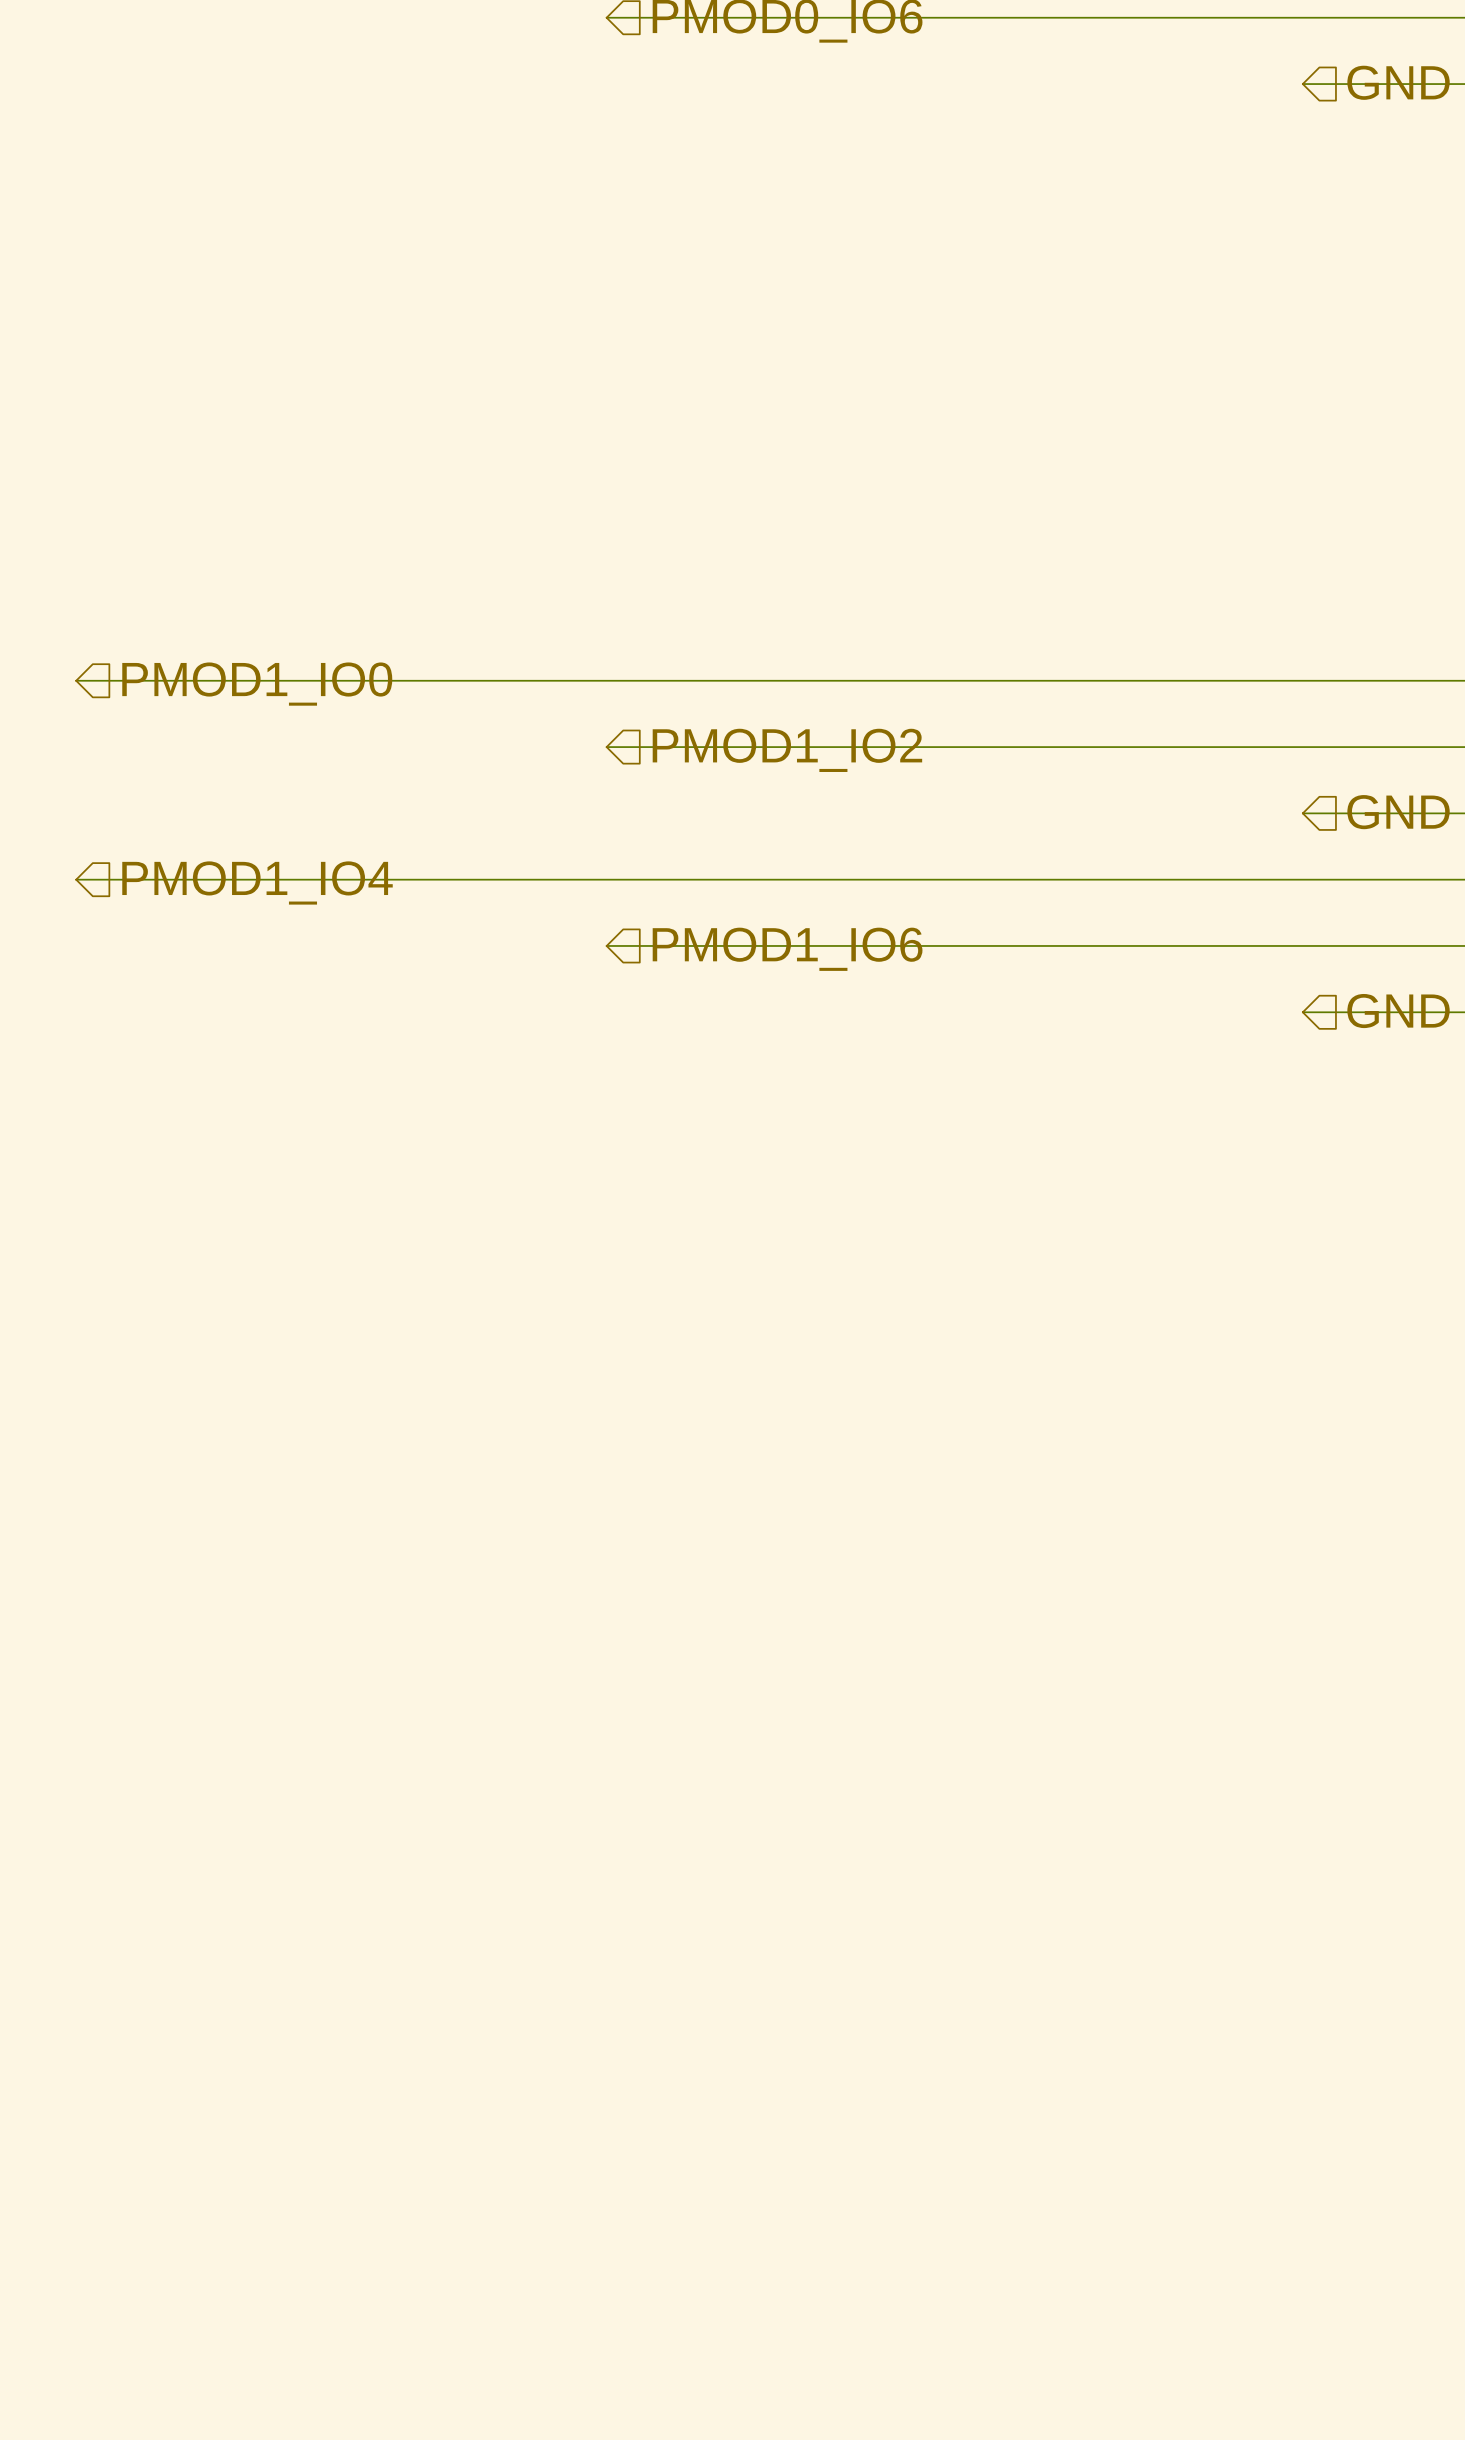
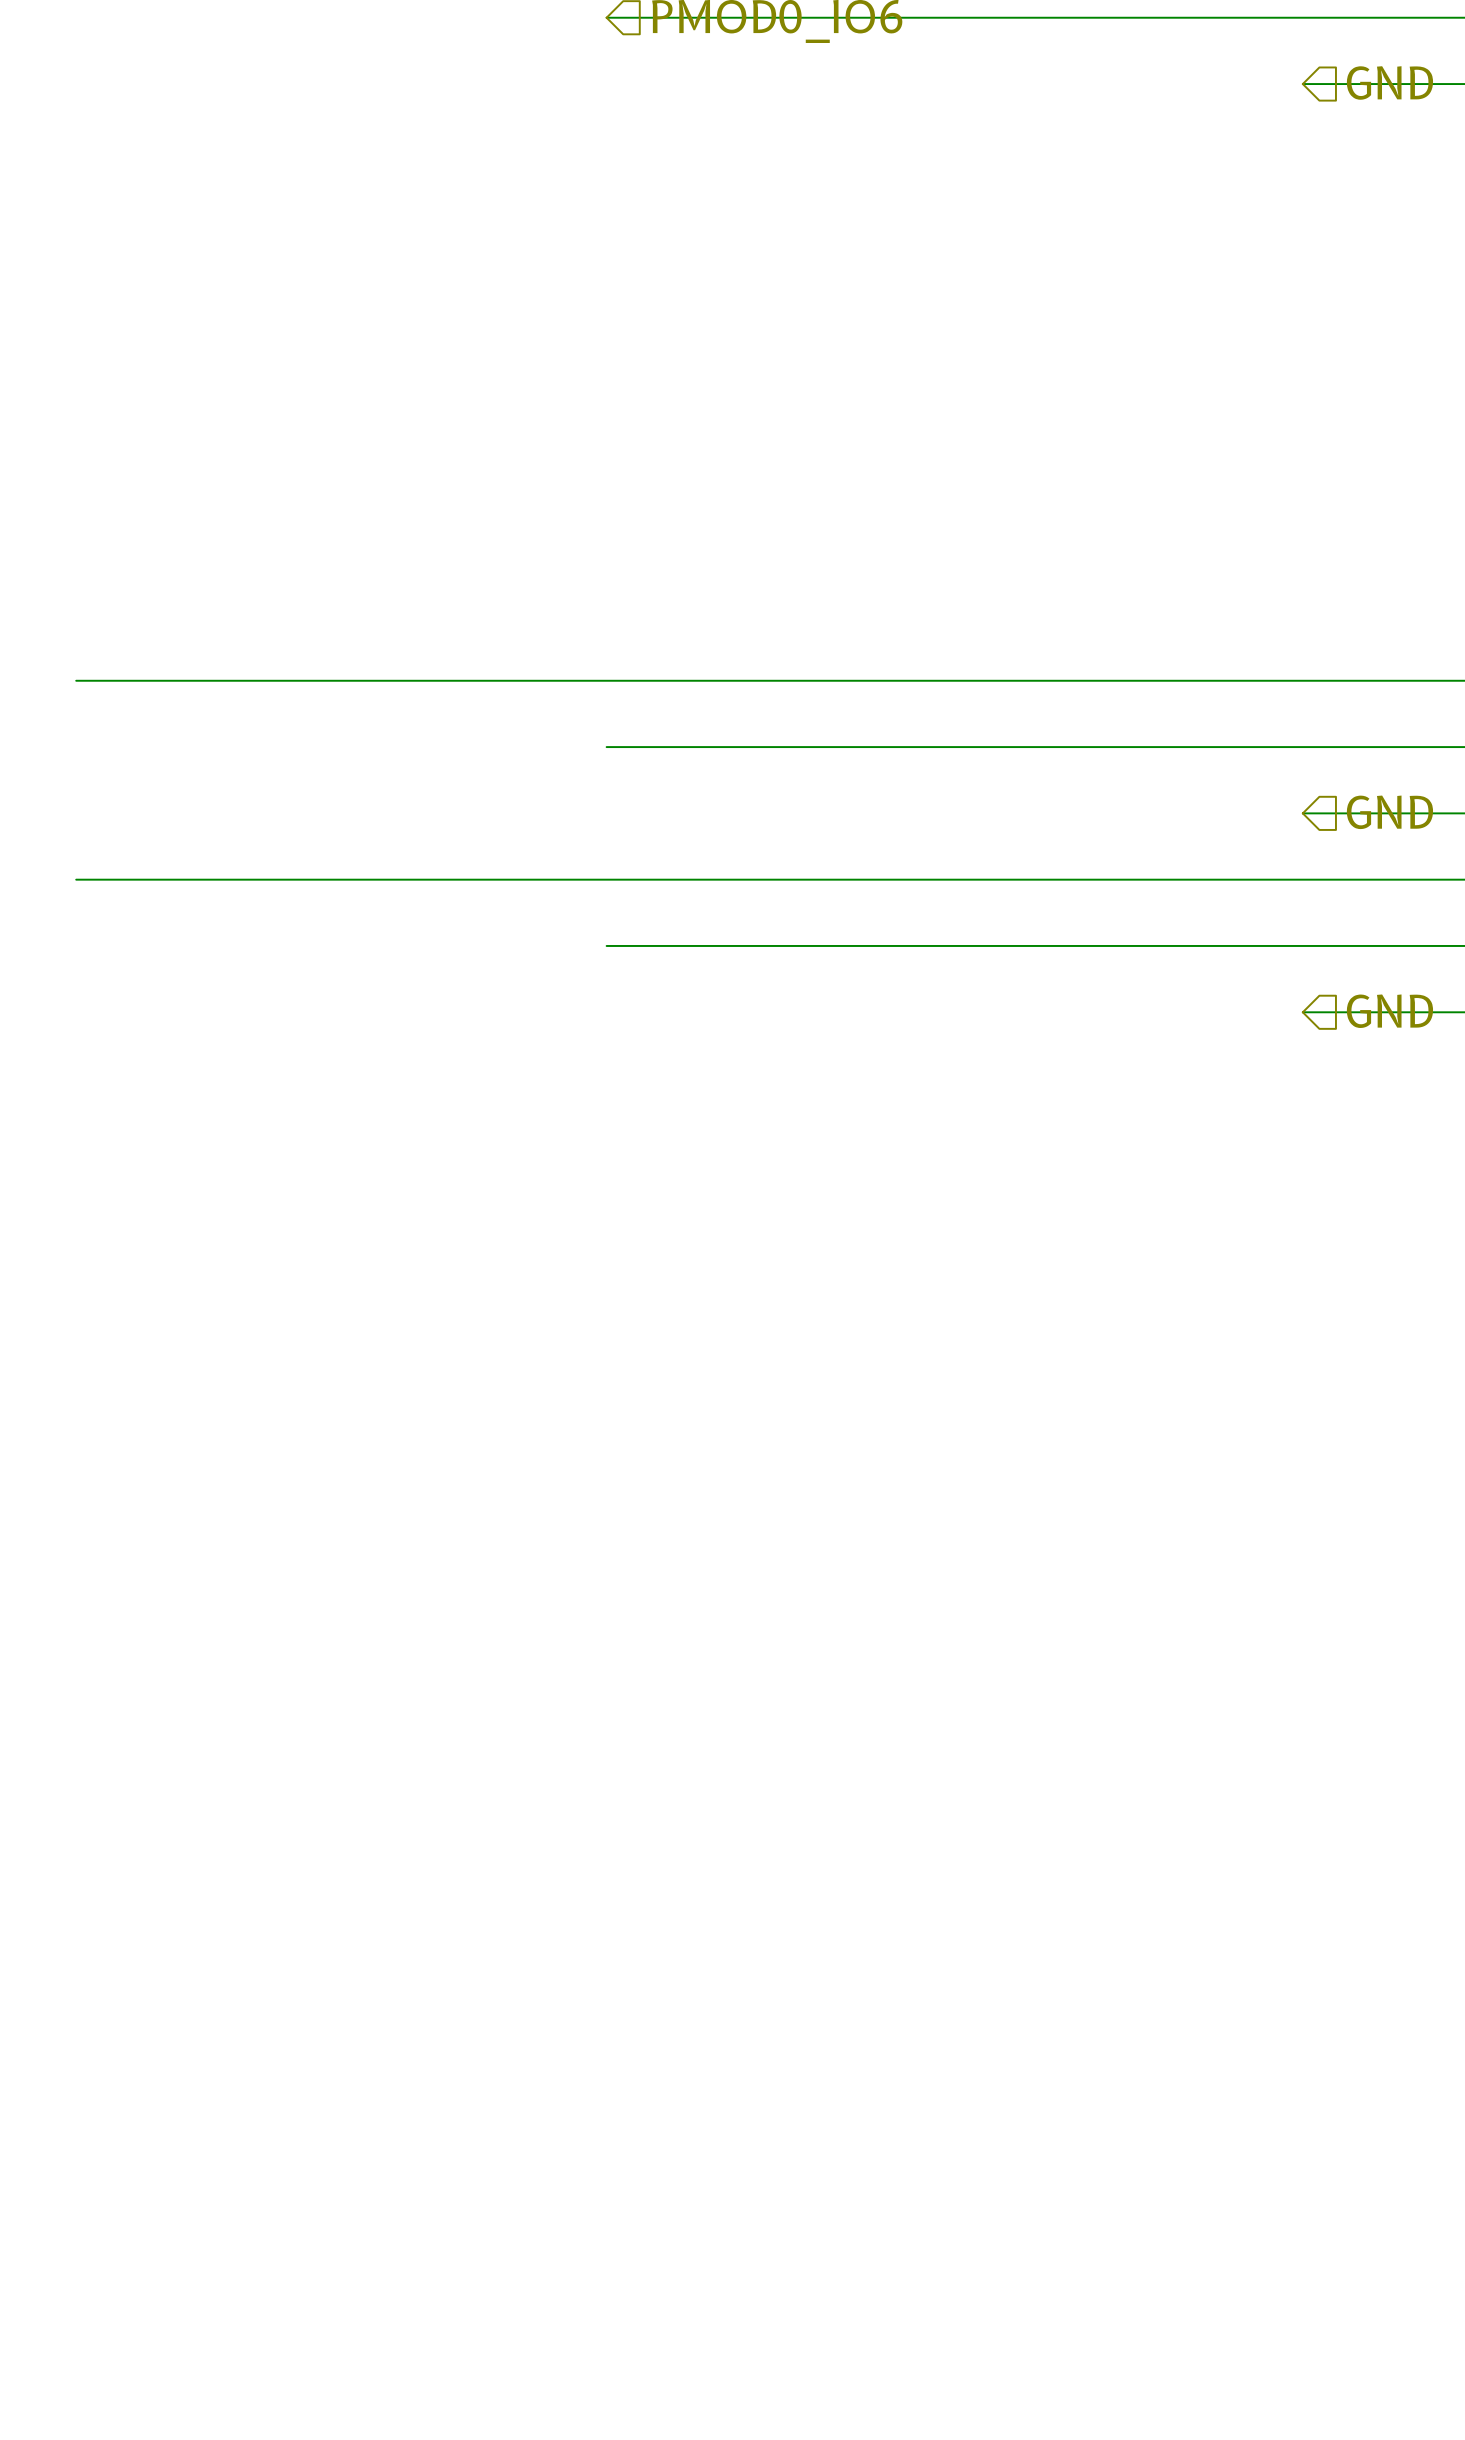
hierarchical label: PMOD1_IO0 (257, 684) -> none
hierarchical label: PMOD1_IO2 (787, 750) -> none
hierarchical label: PMOD1_IO4 (257, 882) -> none
hierarchical label: PMOD1_IO6 (787, 949) -> none

